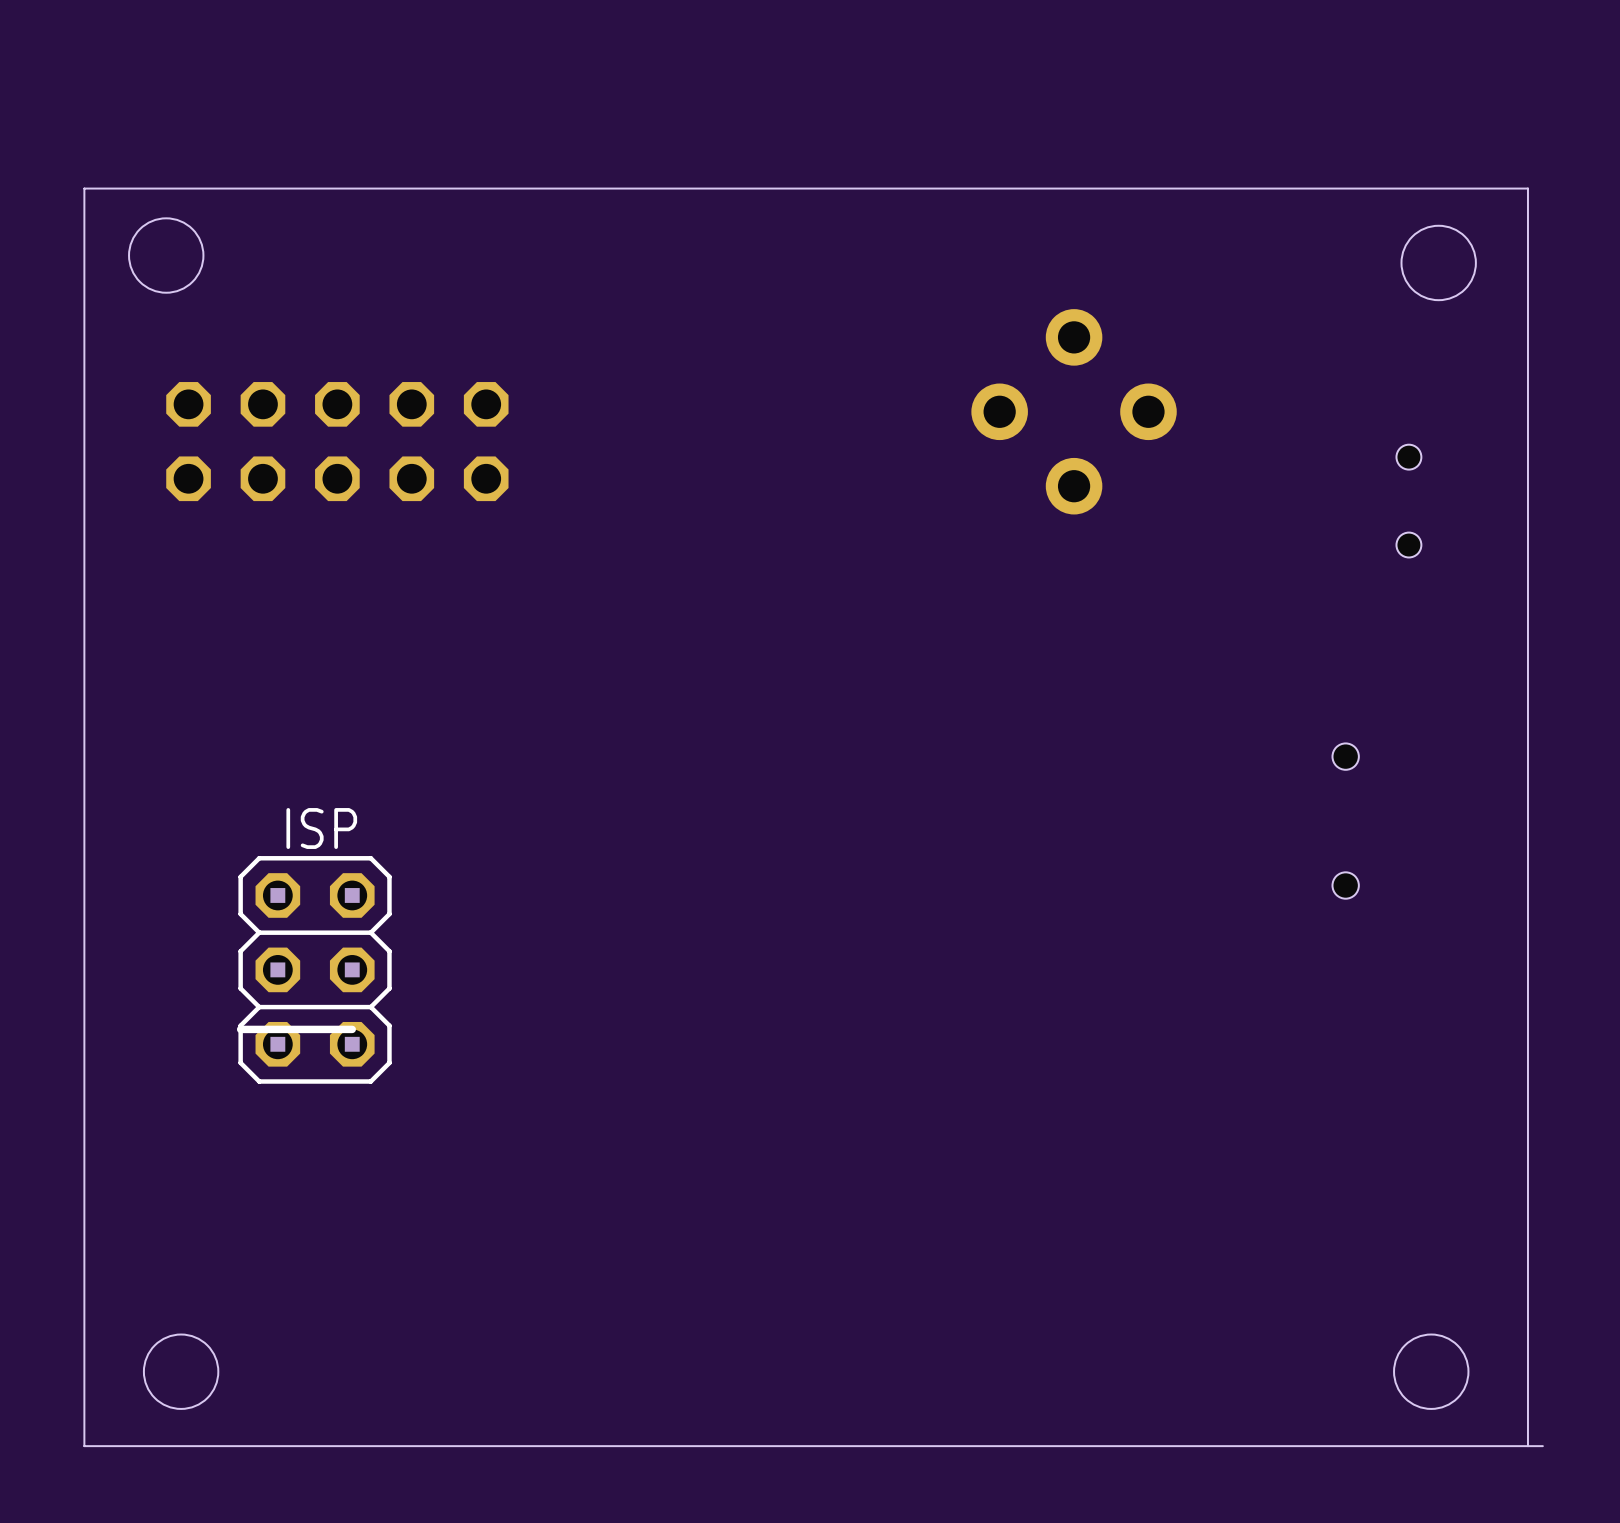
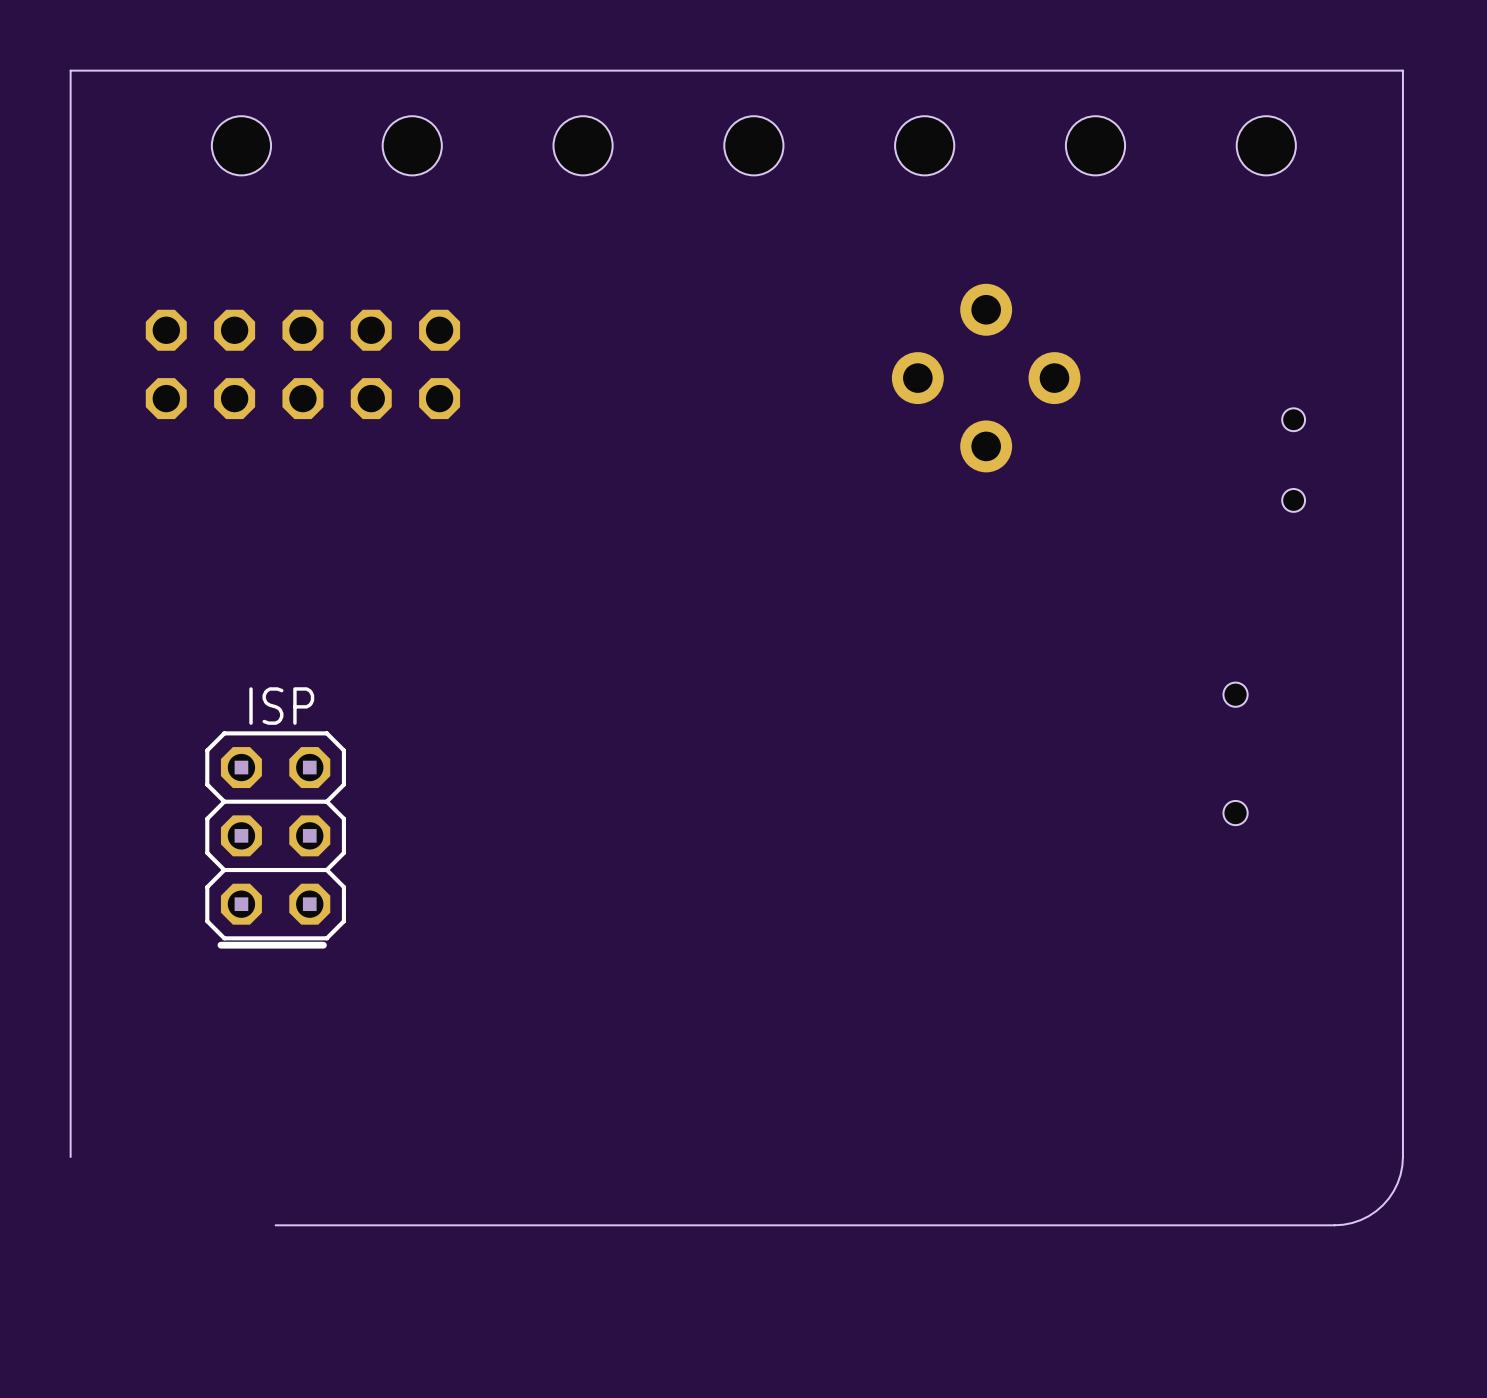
hole: none -> (241, 145)
hole: none -> (412, 145)
hole: none -> (583, 145)
hole: none -> (753, 145)
hole: none -> (924, 145)
hole: none -> (1095, 145)
hole: none -> (1266, 145)
board edge: (1527, 188) (84, 188) (84, 1446) (1542, 1446) -> (1402, 173) (1402, 70) (70, 70) (70, 1156)
round board edge: [128, 218, 204, 293] -> none
round board edge: [1401, 225, 1476, 301] -> none
part position: (337, 441) -> (302, 364)
ISP position: (315, 969) -> (275, 835)
board edge: (1527, 1260) (1527, 1446) -> (1402, 1156) (1397, 1183) (1382, 1205) (1360, 1220) (1334, 1225) (275, 1225)
round board edge: [143, 1334, 219, 1409] -> none
round board edge: [1394, 1334, 1469, 1409] -> none

